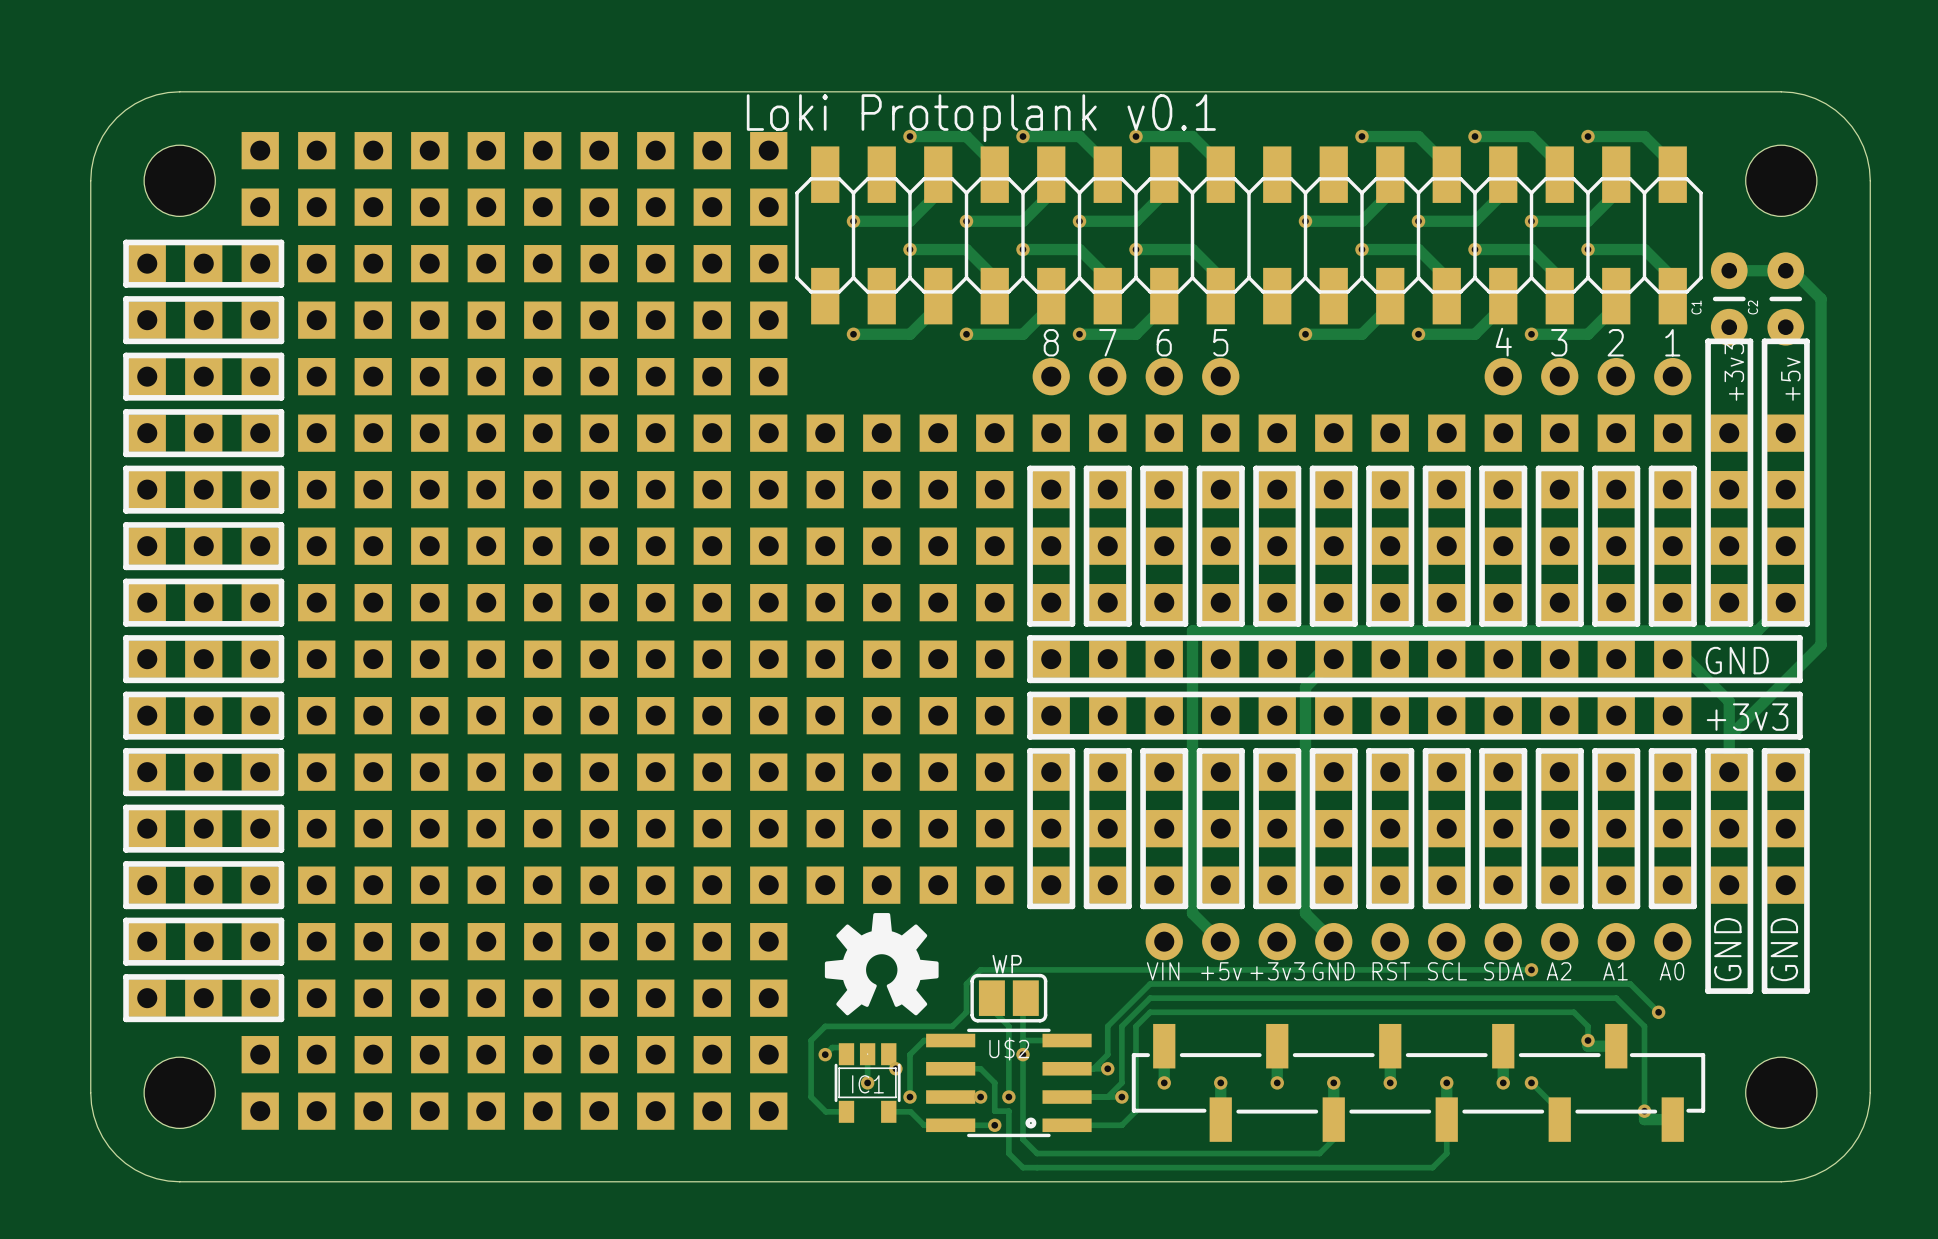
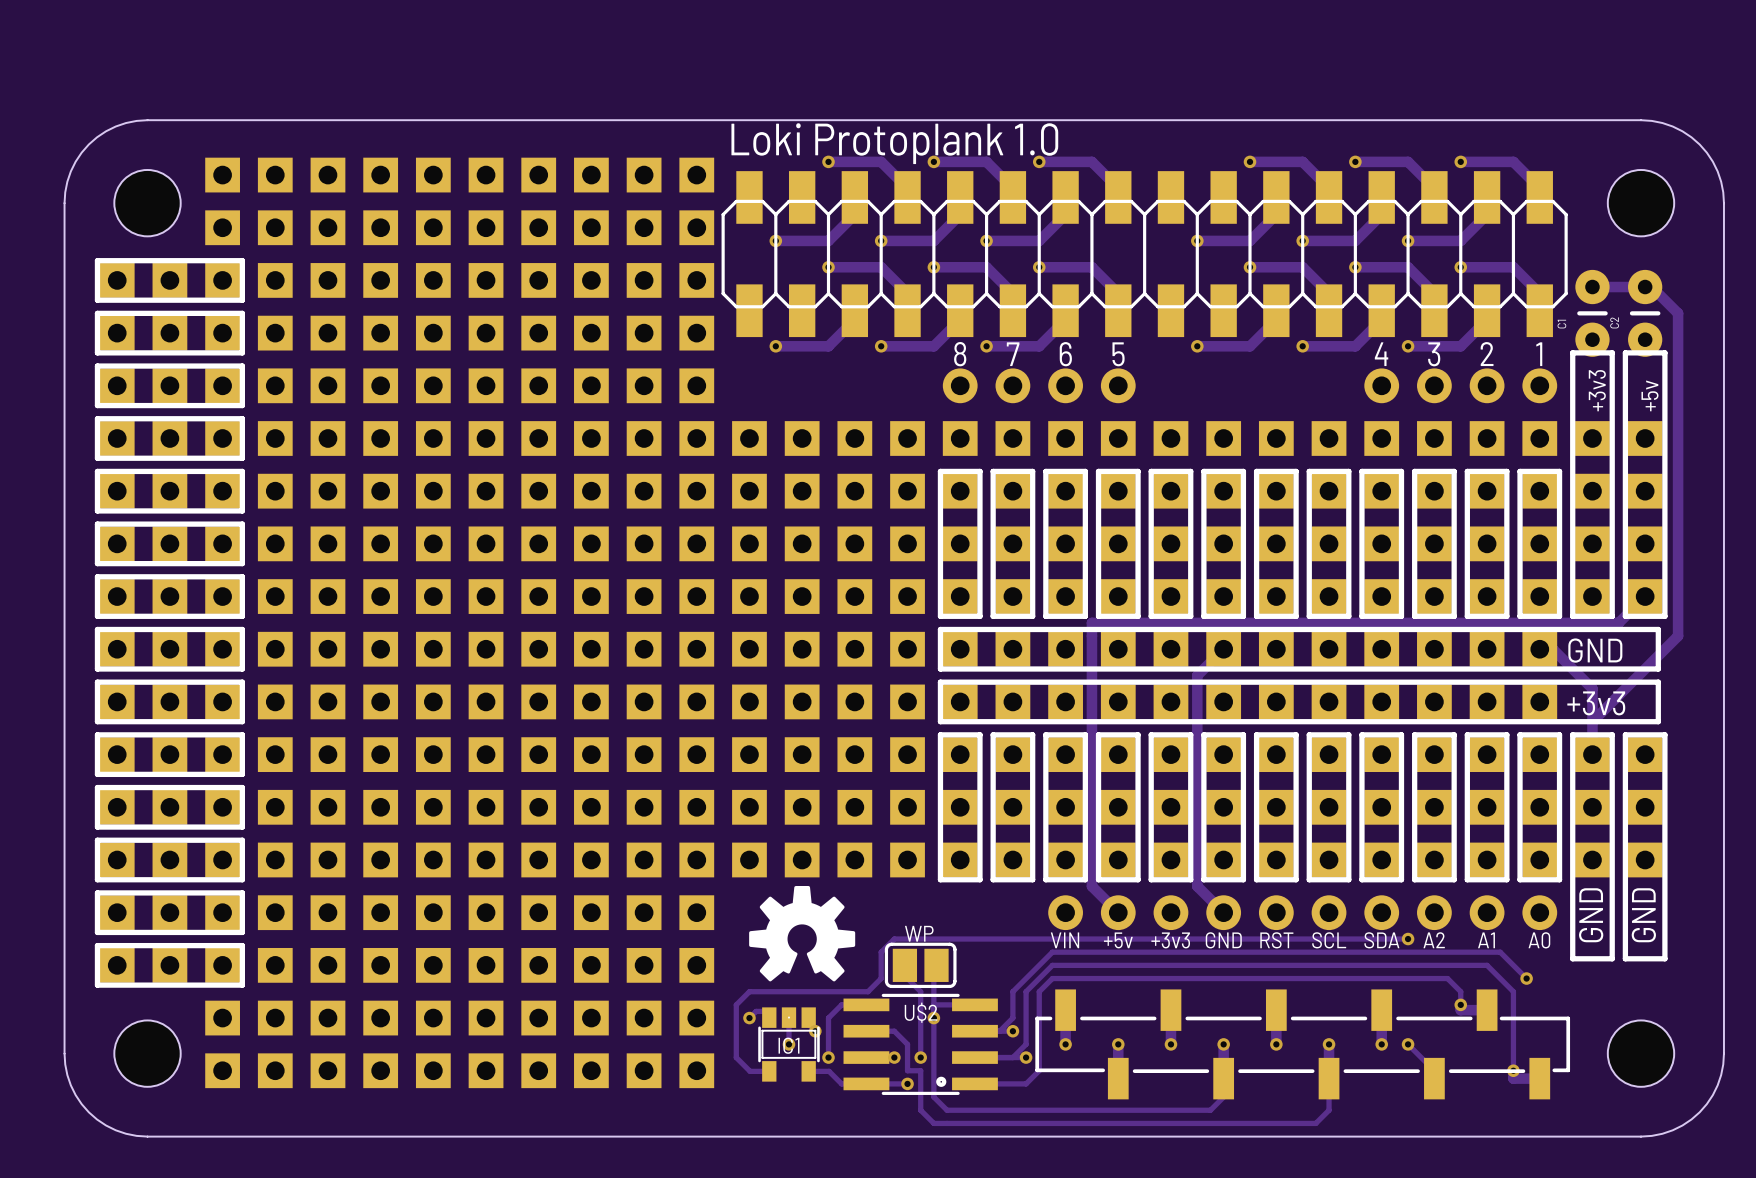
text: Loki Protoplank v0.1 (981, 118) -> Loki Protoplank 1.0 (894, 143)

